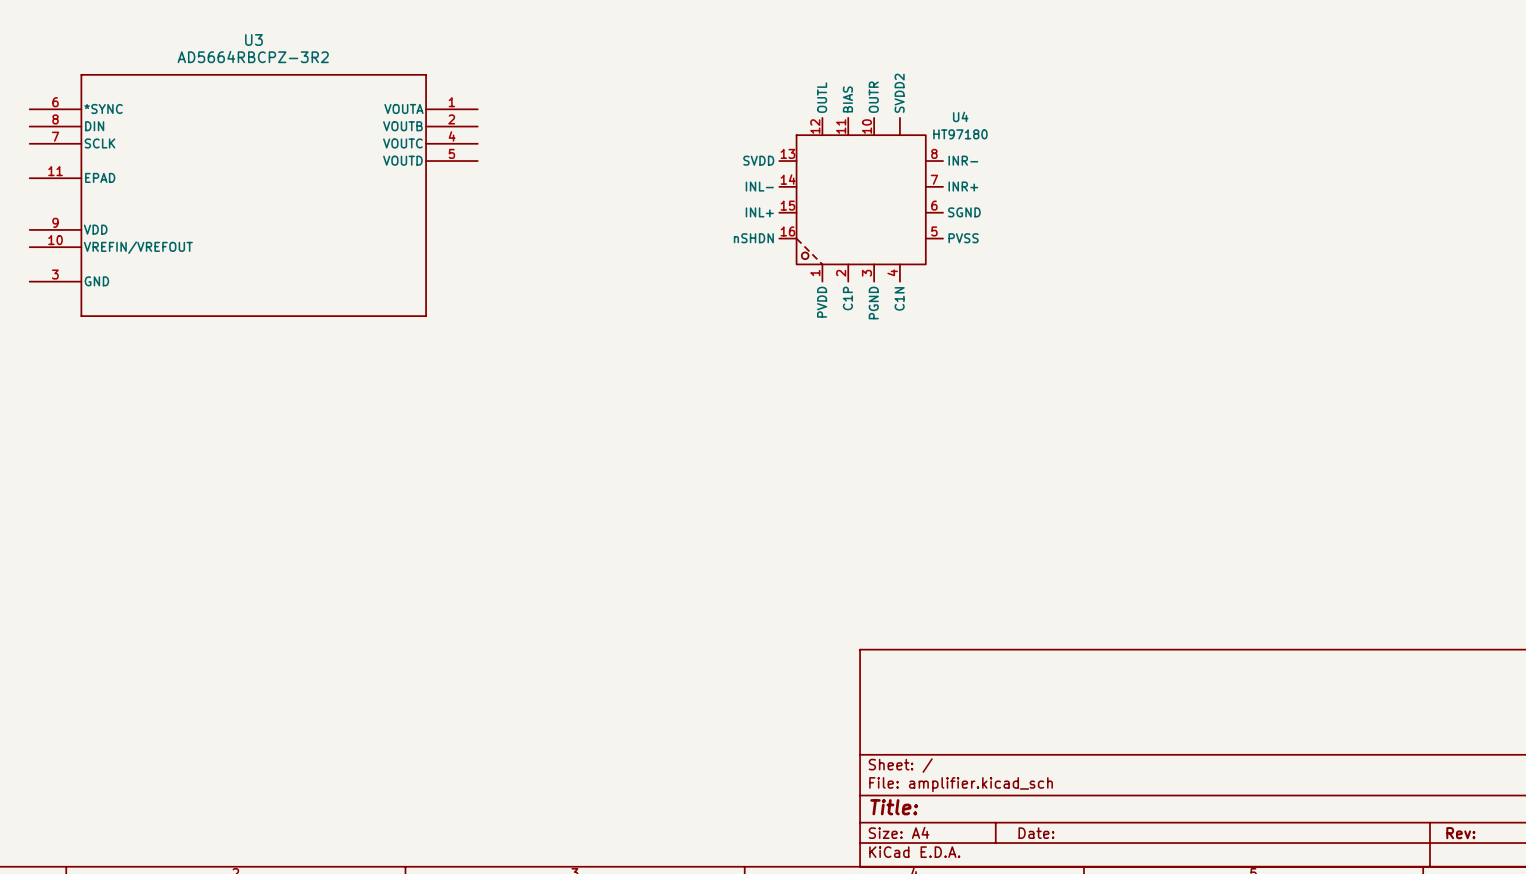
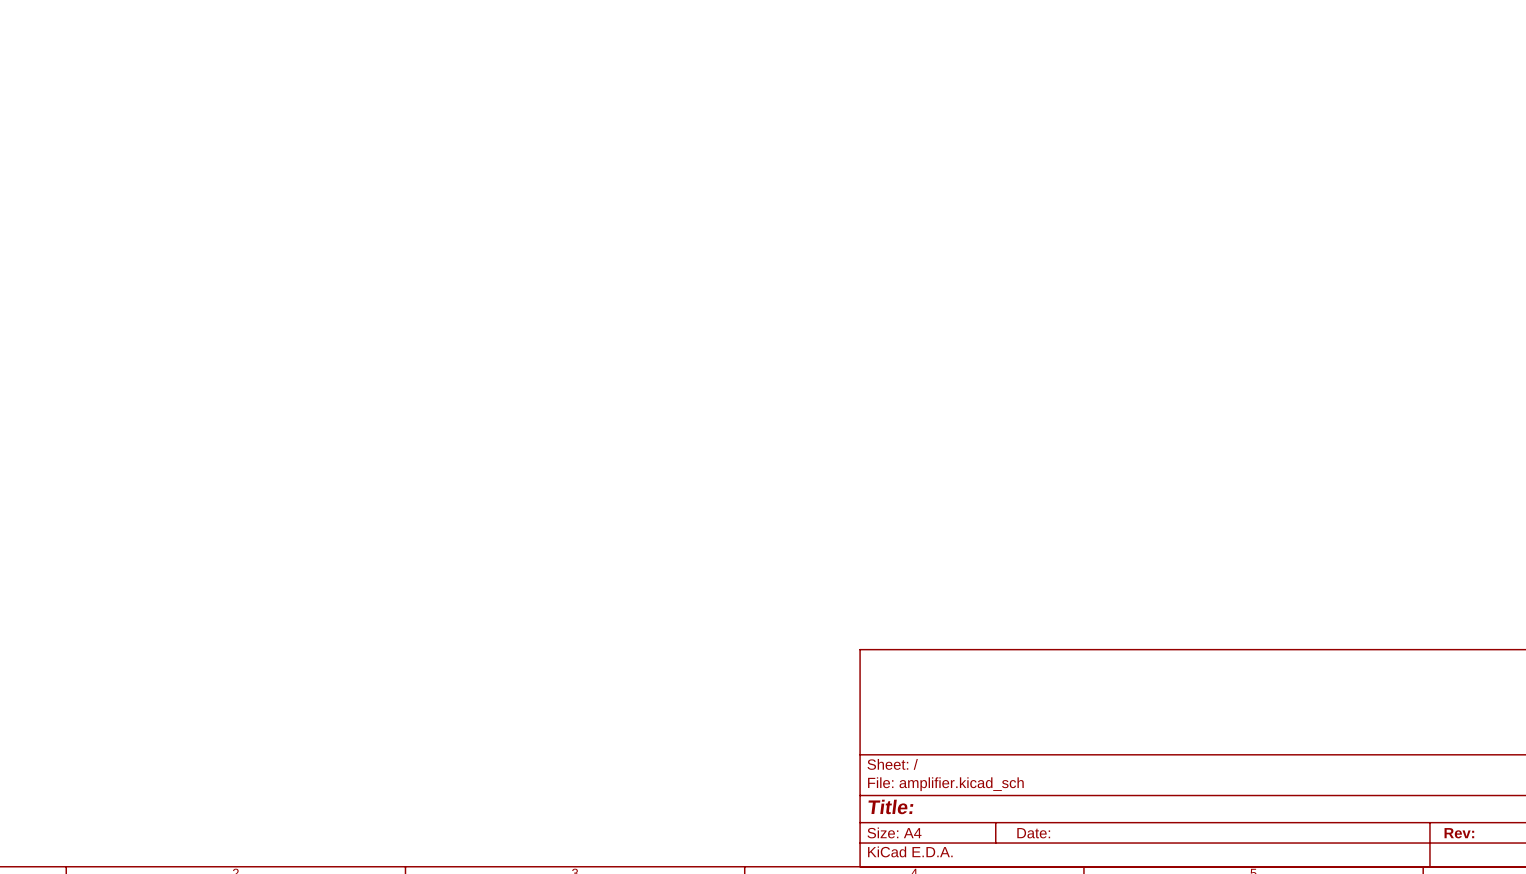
U3: AD5664RBCPZ-3R2 (253, 195) -> none
U4: HT97180 (861, 199) -> none

